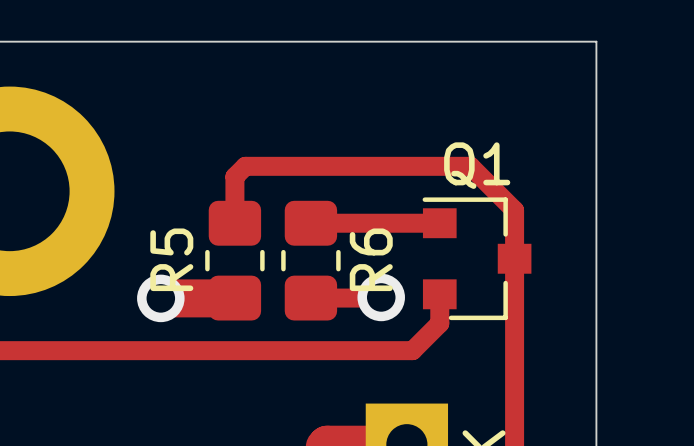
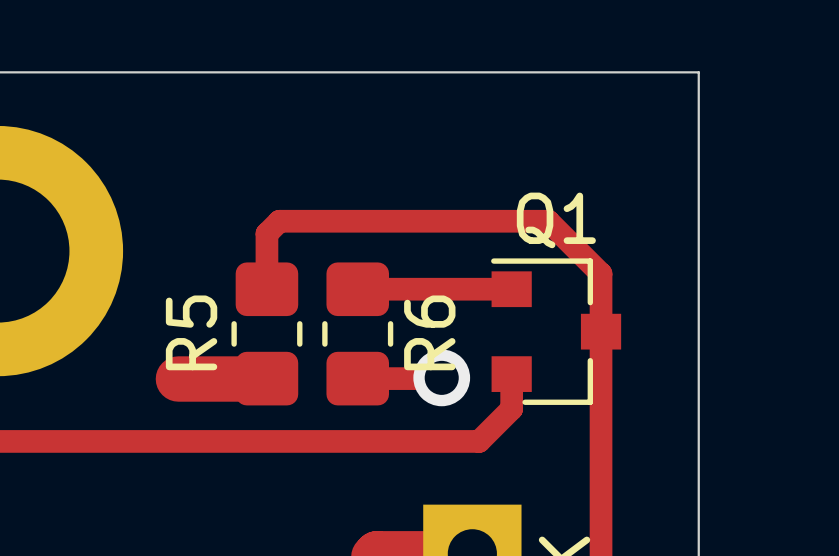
via: (160, 298) -> none

